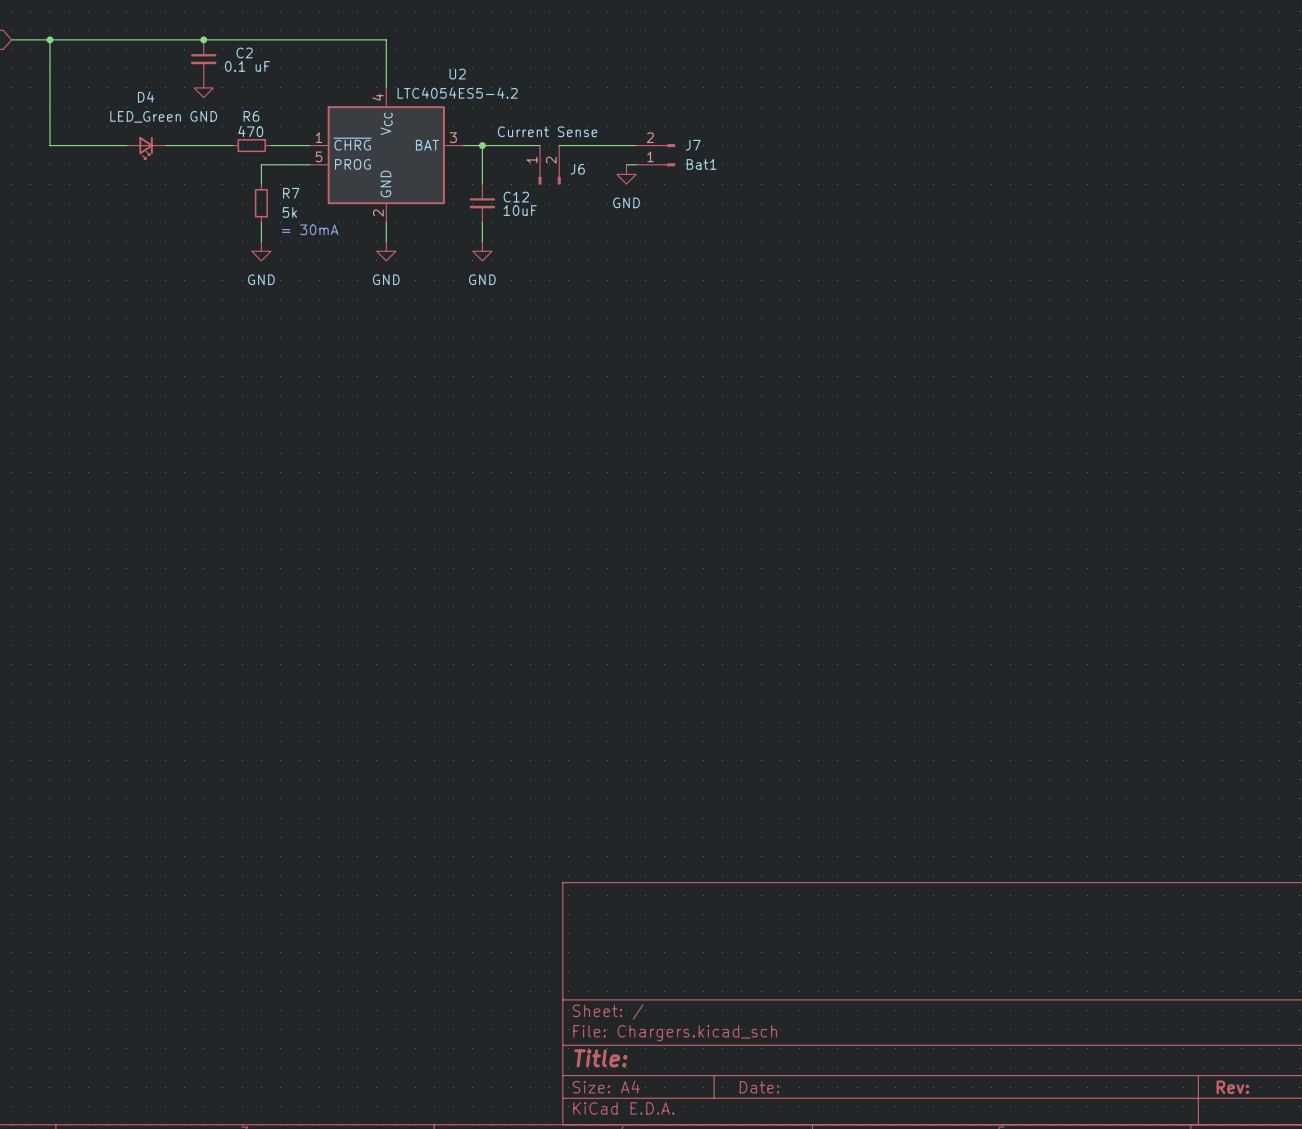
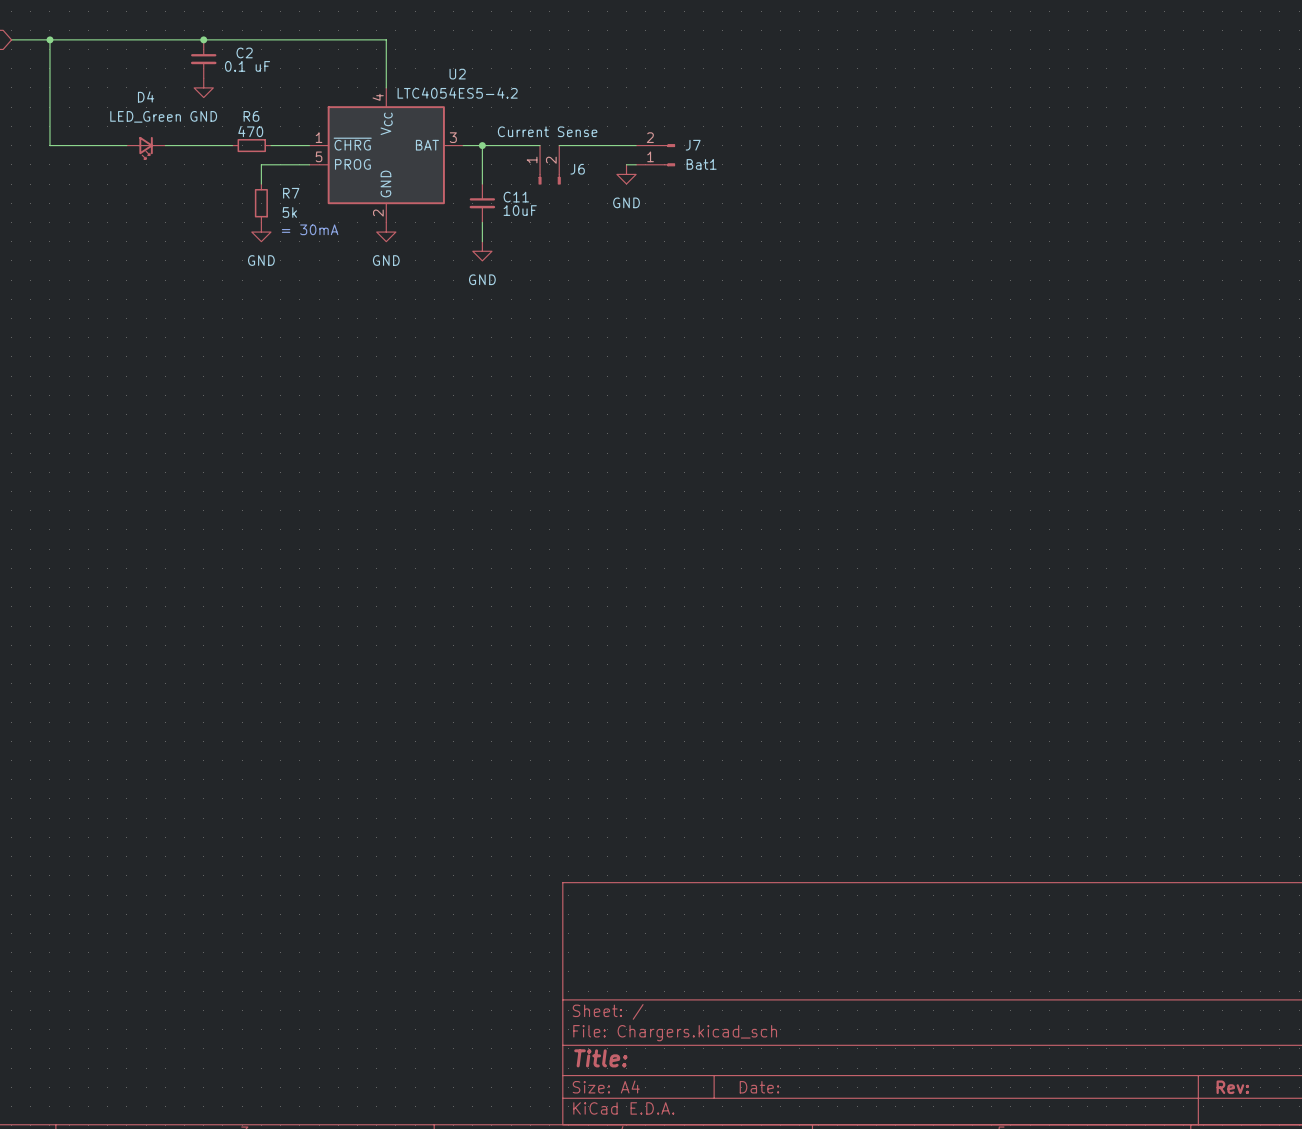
C12 name: C12 (516, 197) -> C11 (516, 197)
power symbol position: GND (261, 251) -> GND (261, 232)
power symbol position: GND (386, 251) -> GND (386, 232)

